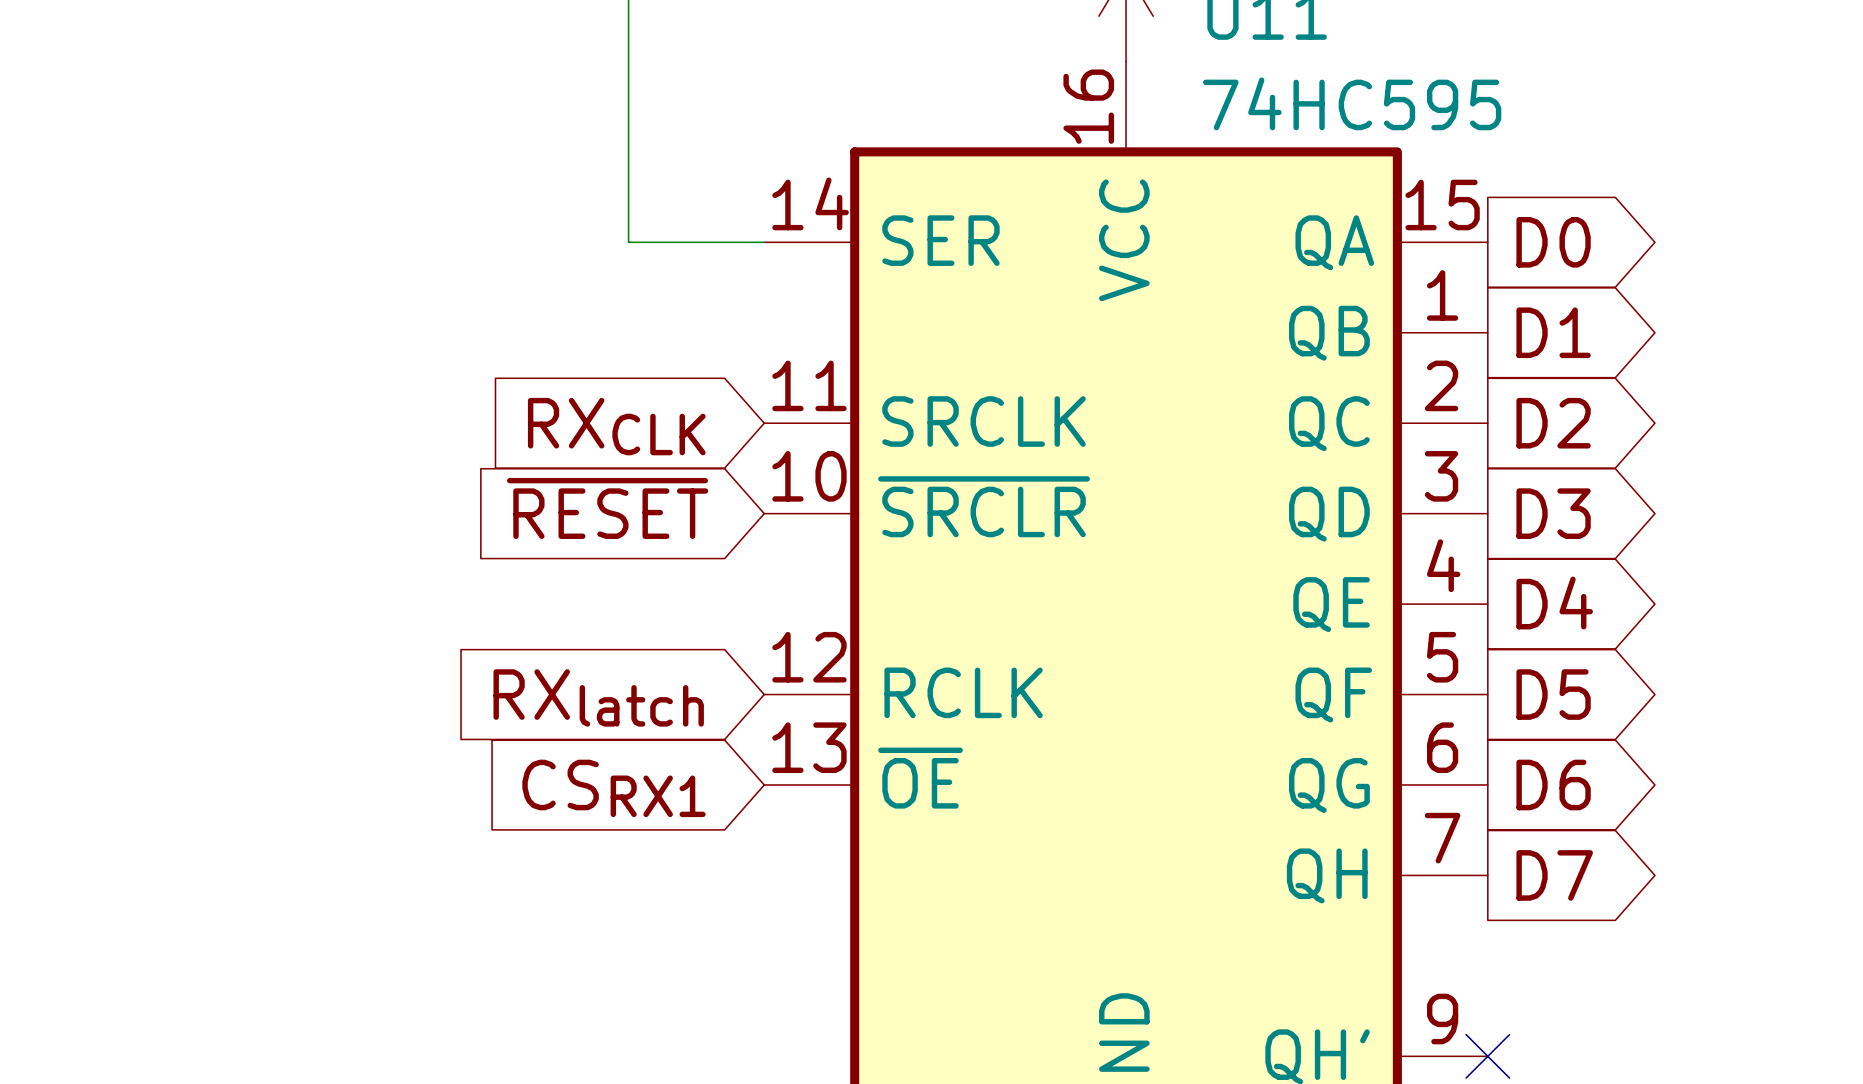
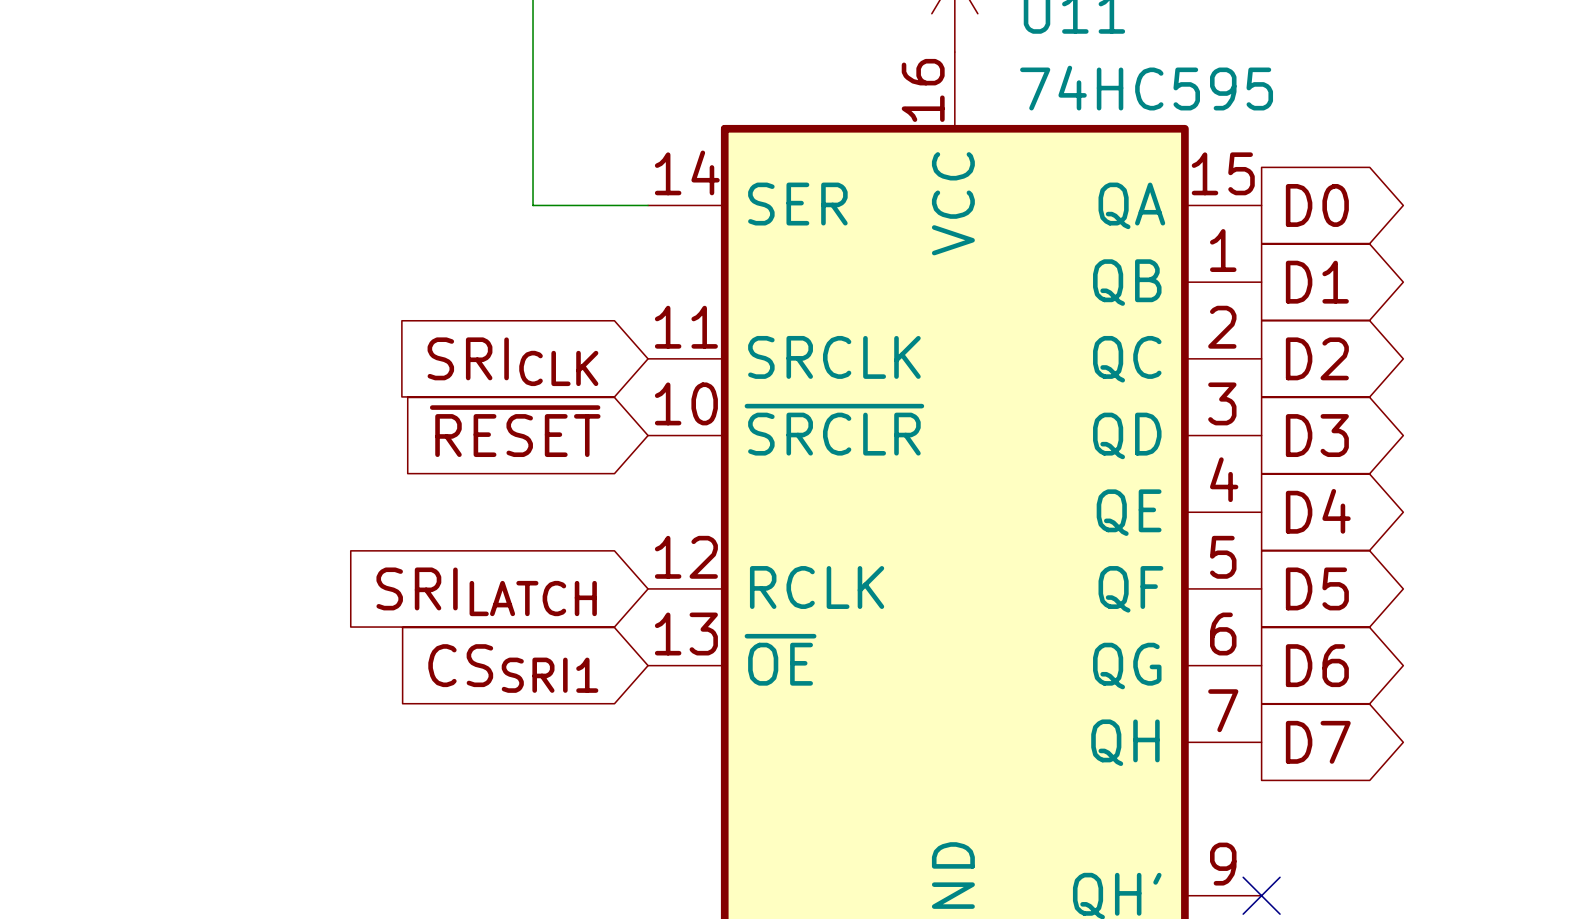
global label: RXCLK (616, 426) -> SRICLK (512, 361)
global label: RXlatch (598, 697) -> SRILATCH (486, 591)
global label: CSRX1 (613, 788) -> CSSRI1 (513, 668)

